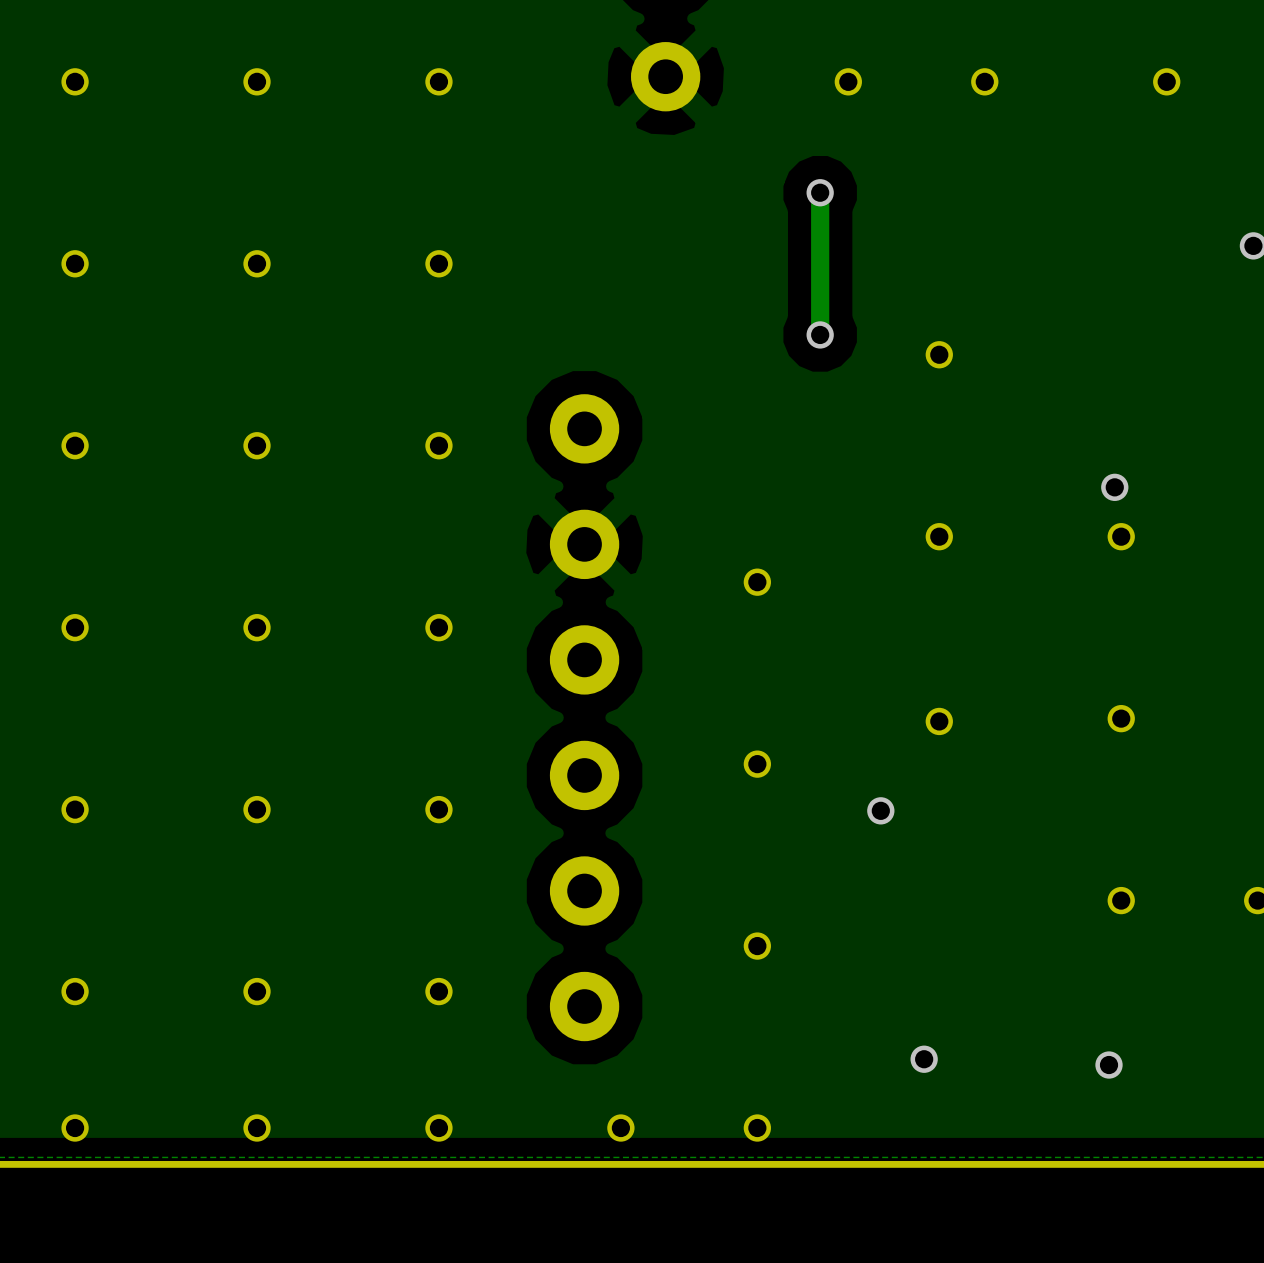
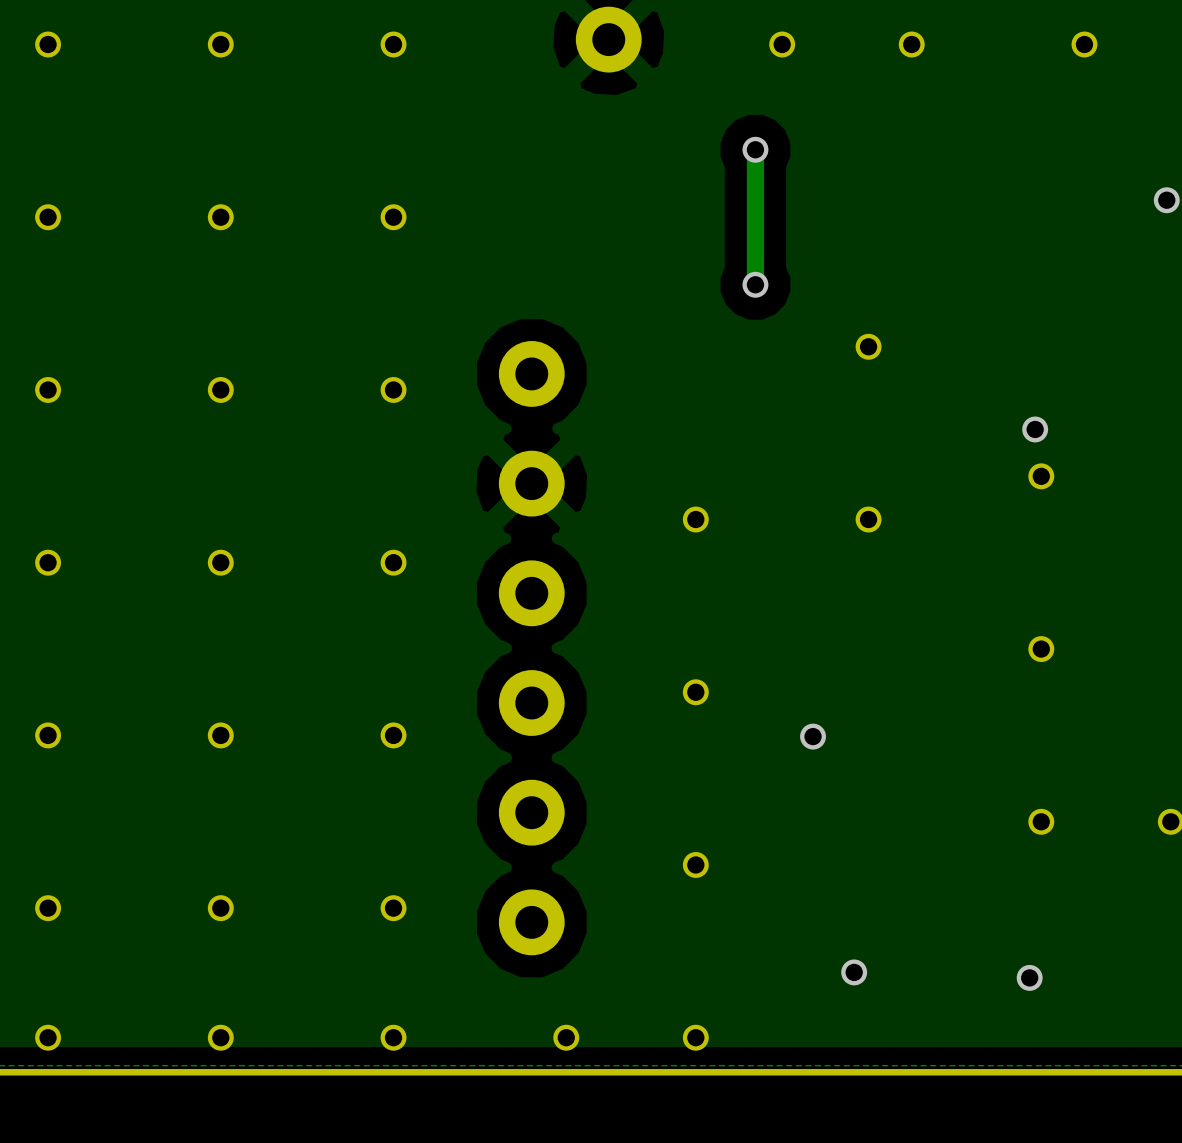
part position: (939, 354) -> (868, 346)
part position: (939, 536) -> (868, 519)
part: (939, 721) -> none

